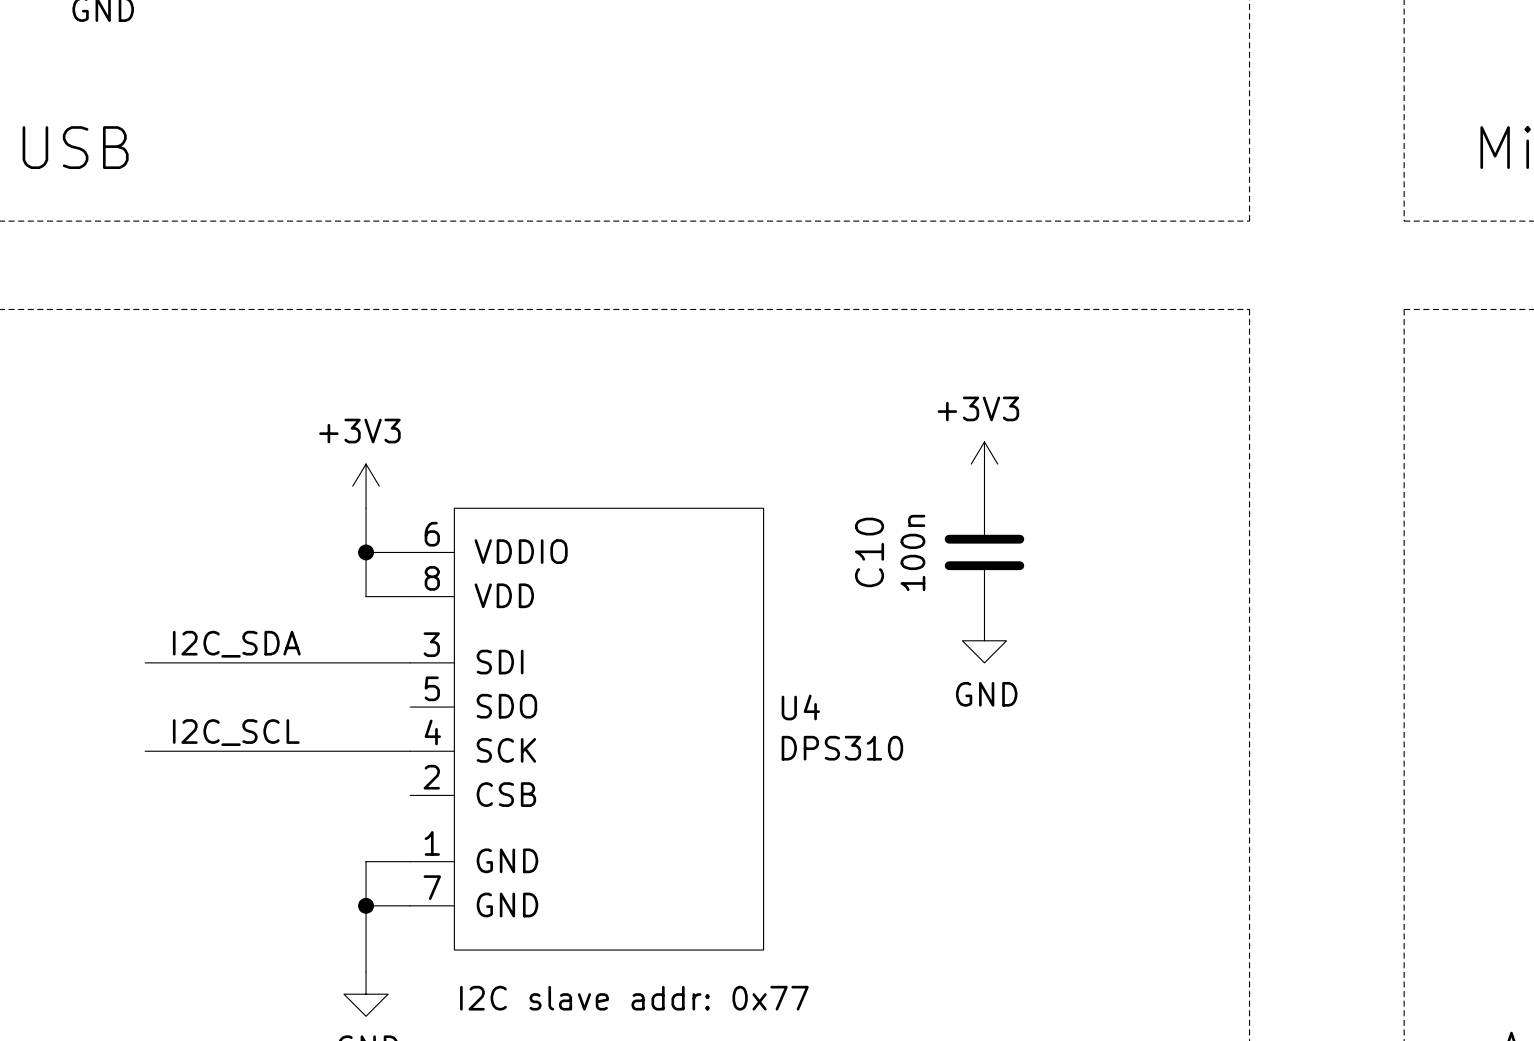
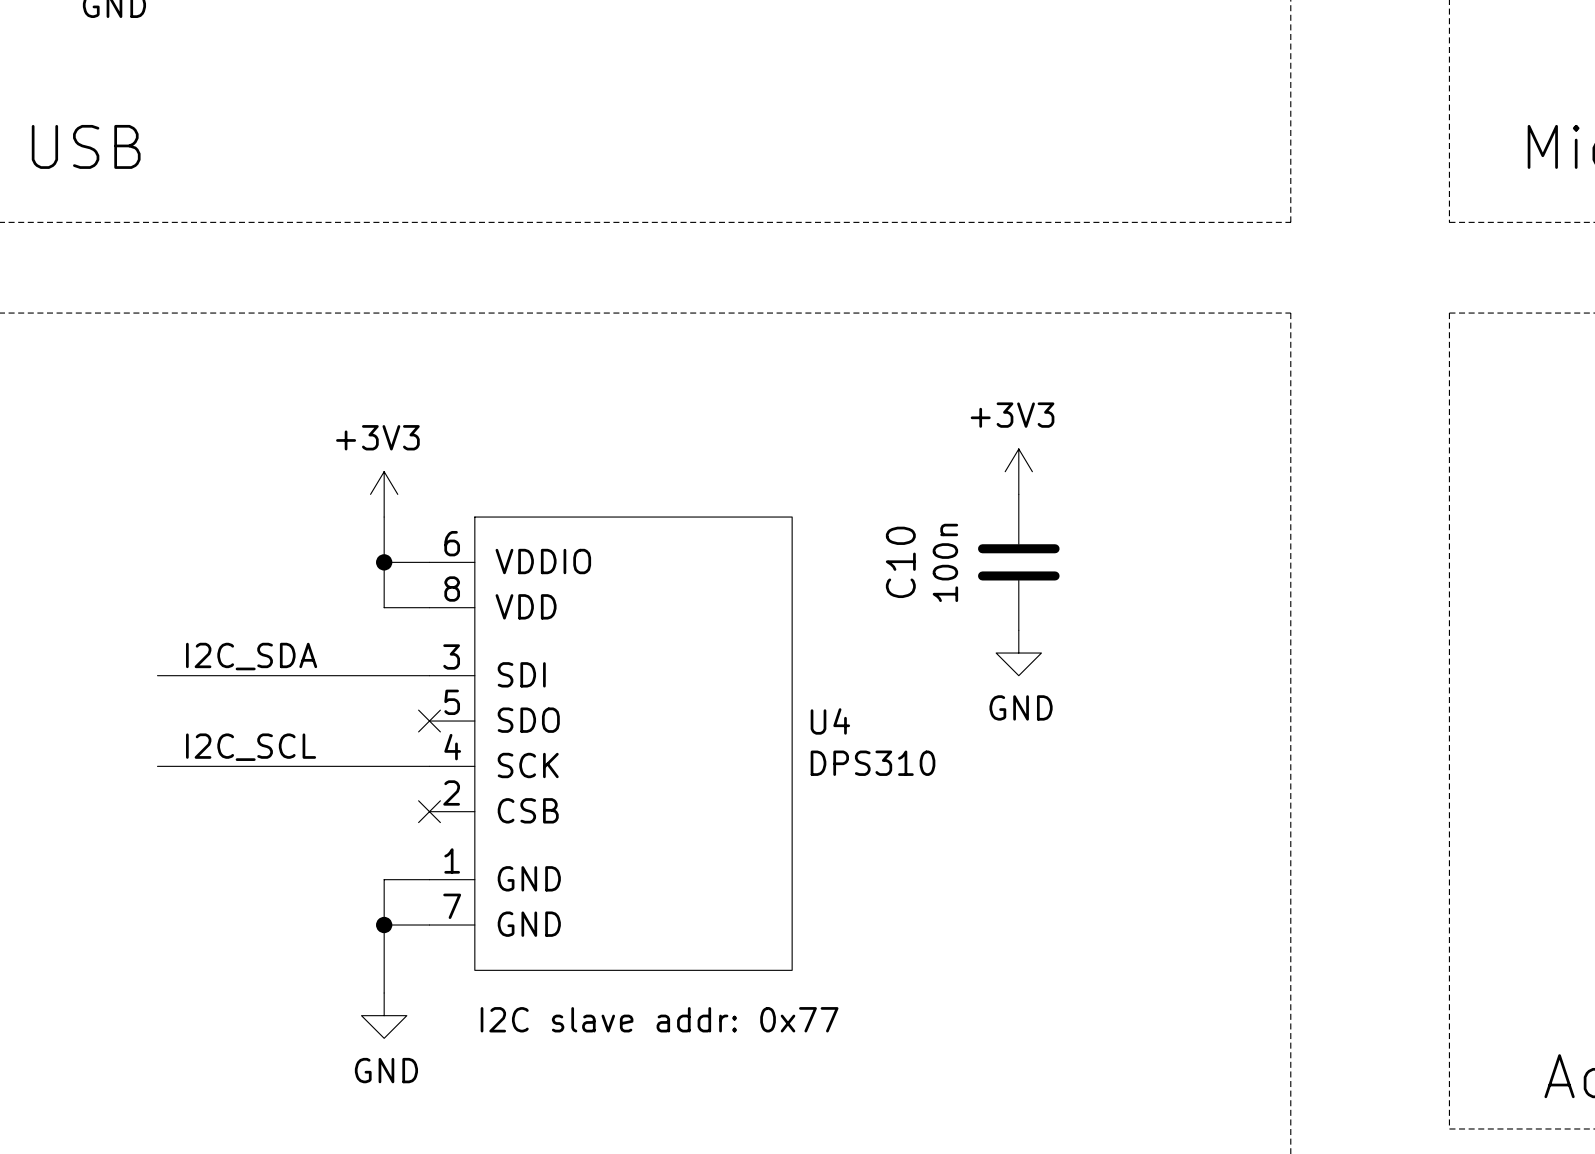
no-connect mark: none -> (429, 721)
no-connect mark: none -> (429, 811)

